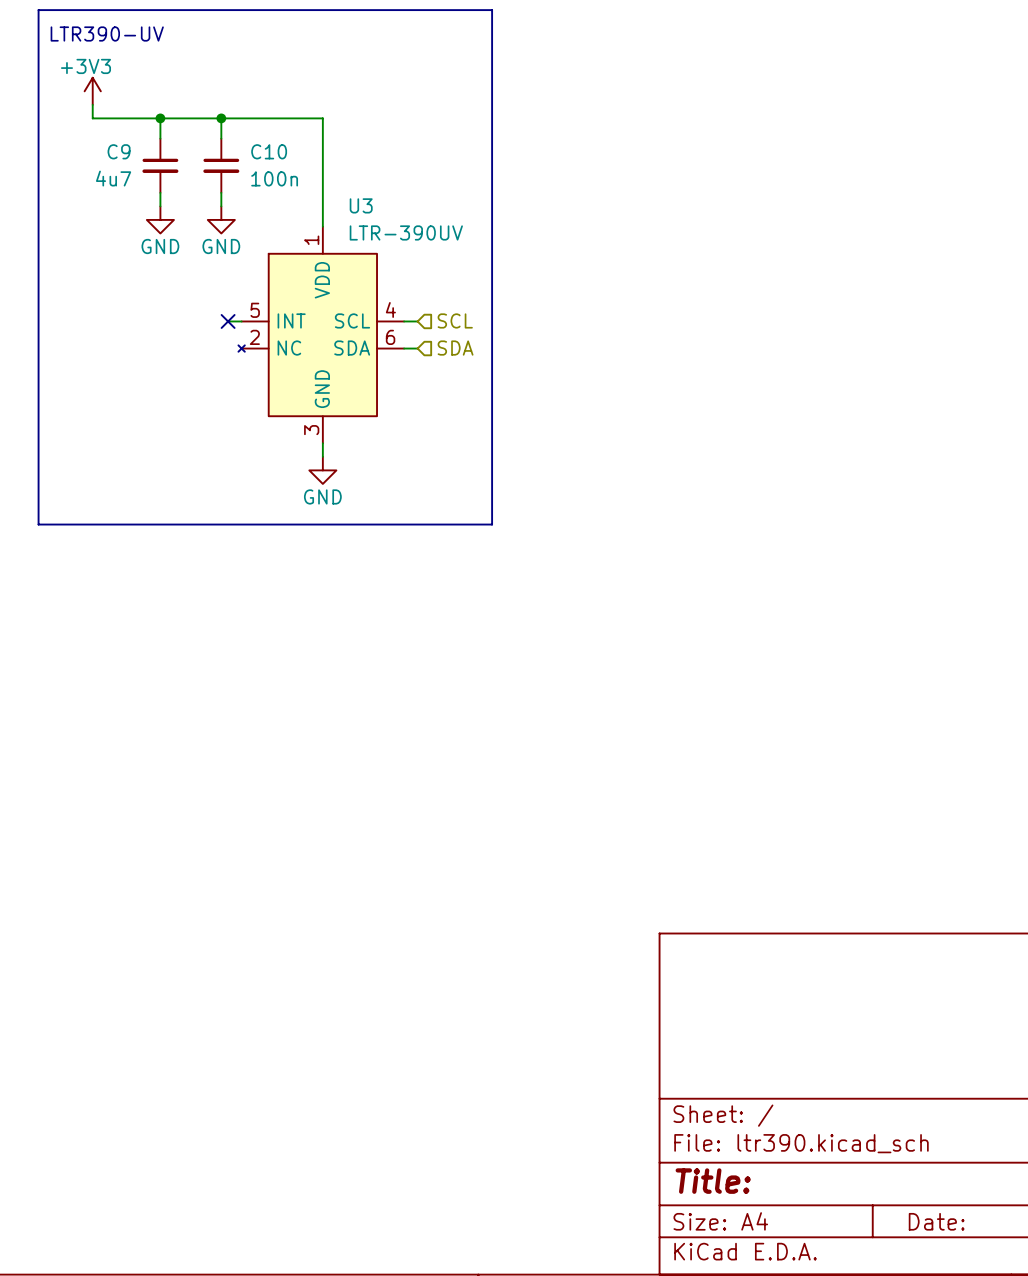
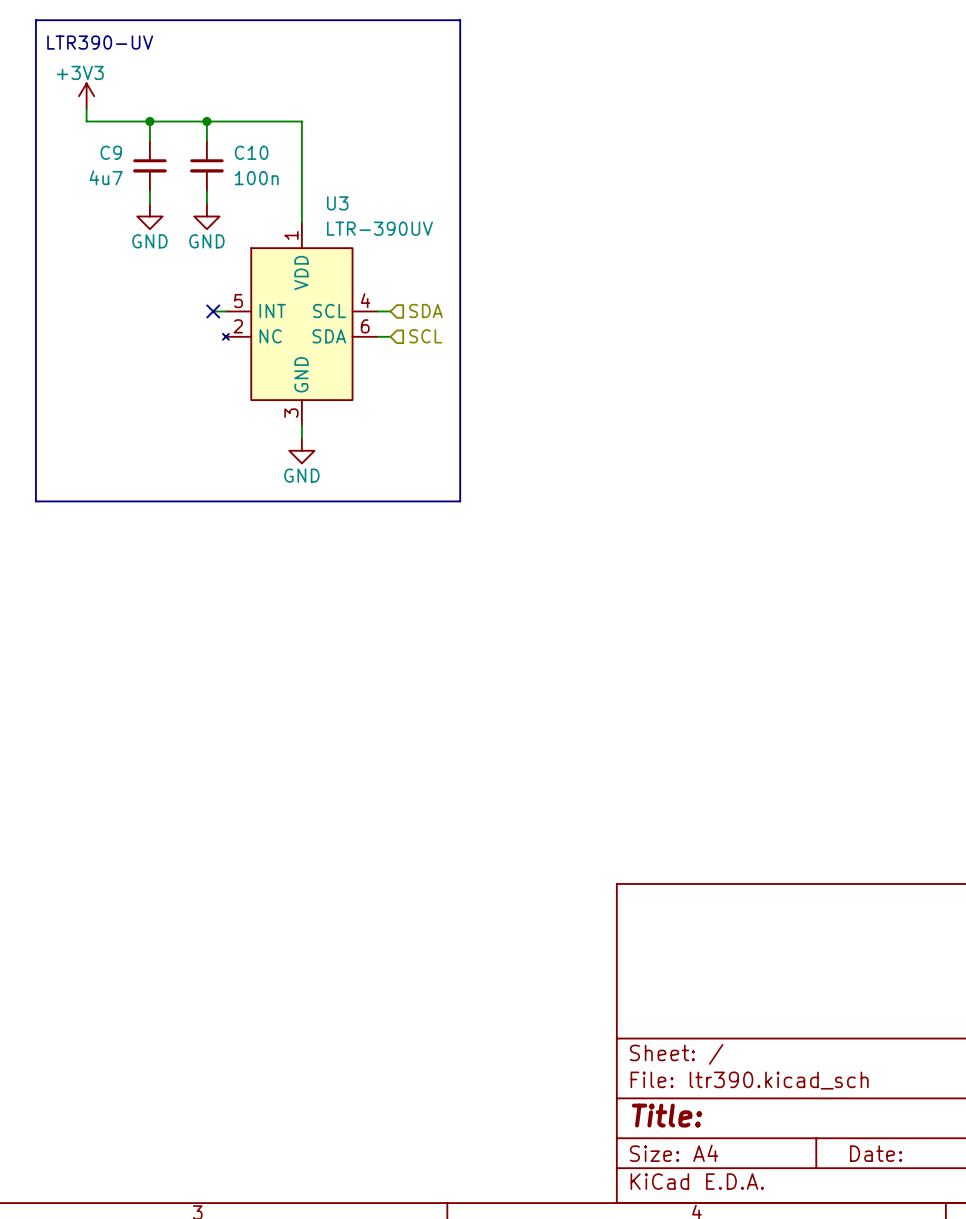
hierarchical label: SCL (455, 320) -> SDA (426, 311)
hierarchical label: SDA (455, 348) -> SCL (425, 336)

